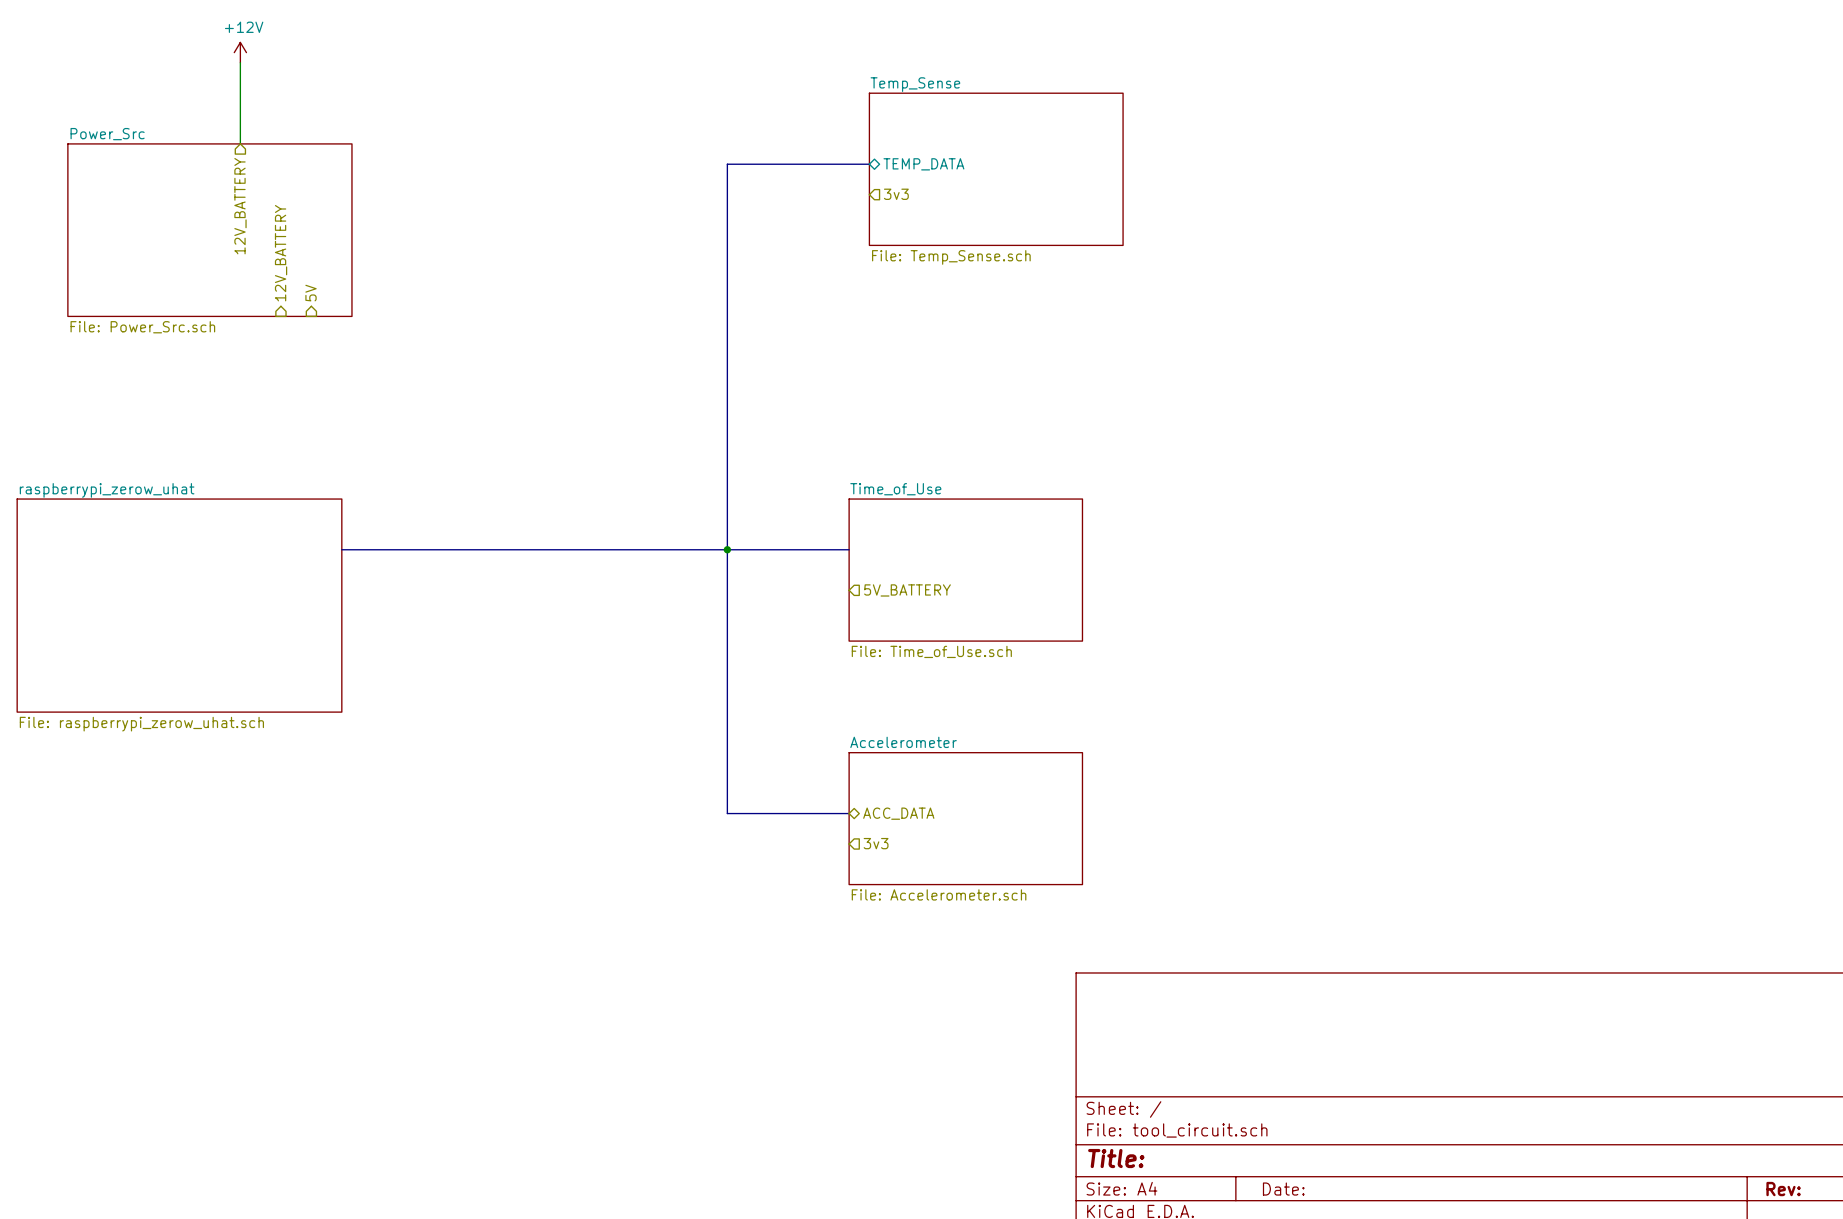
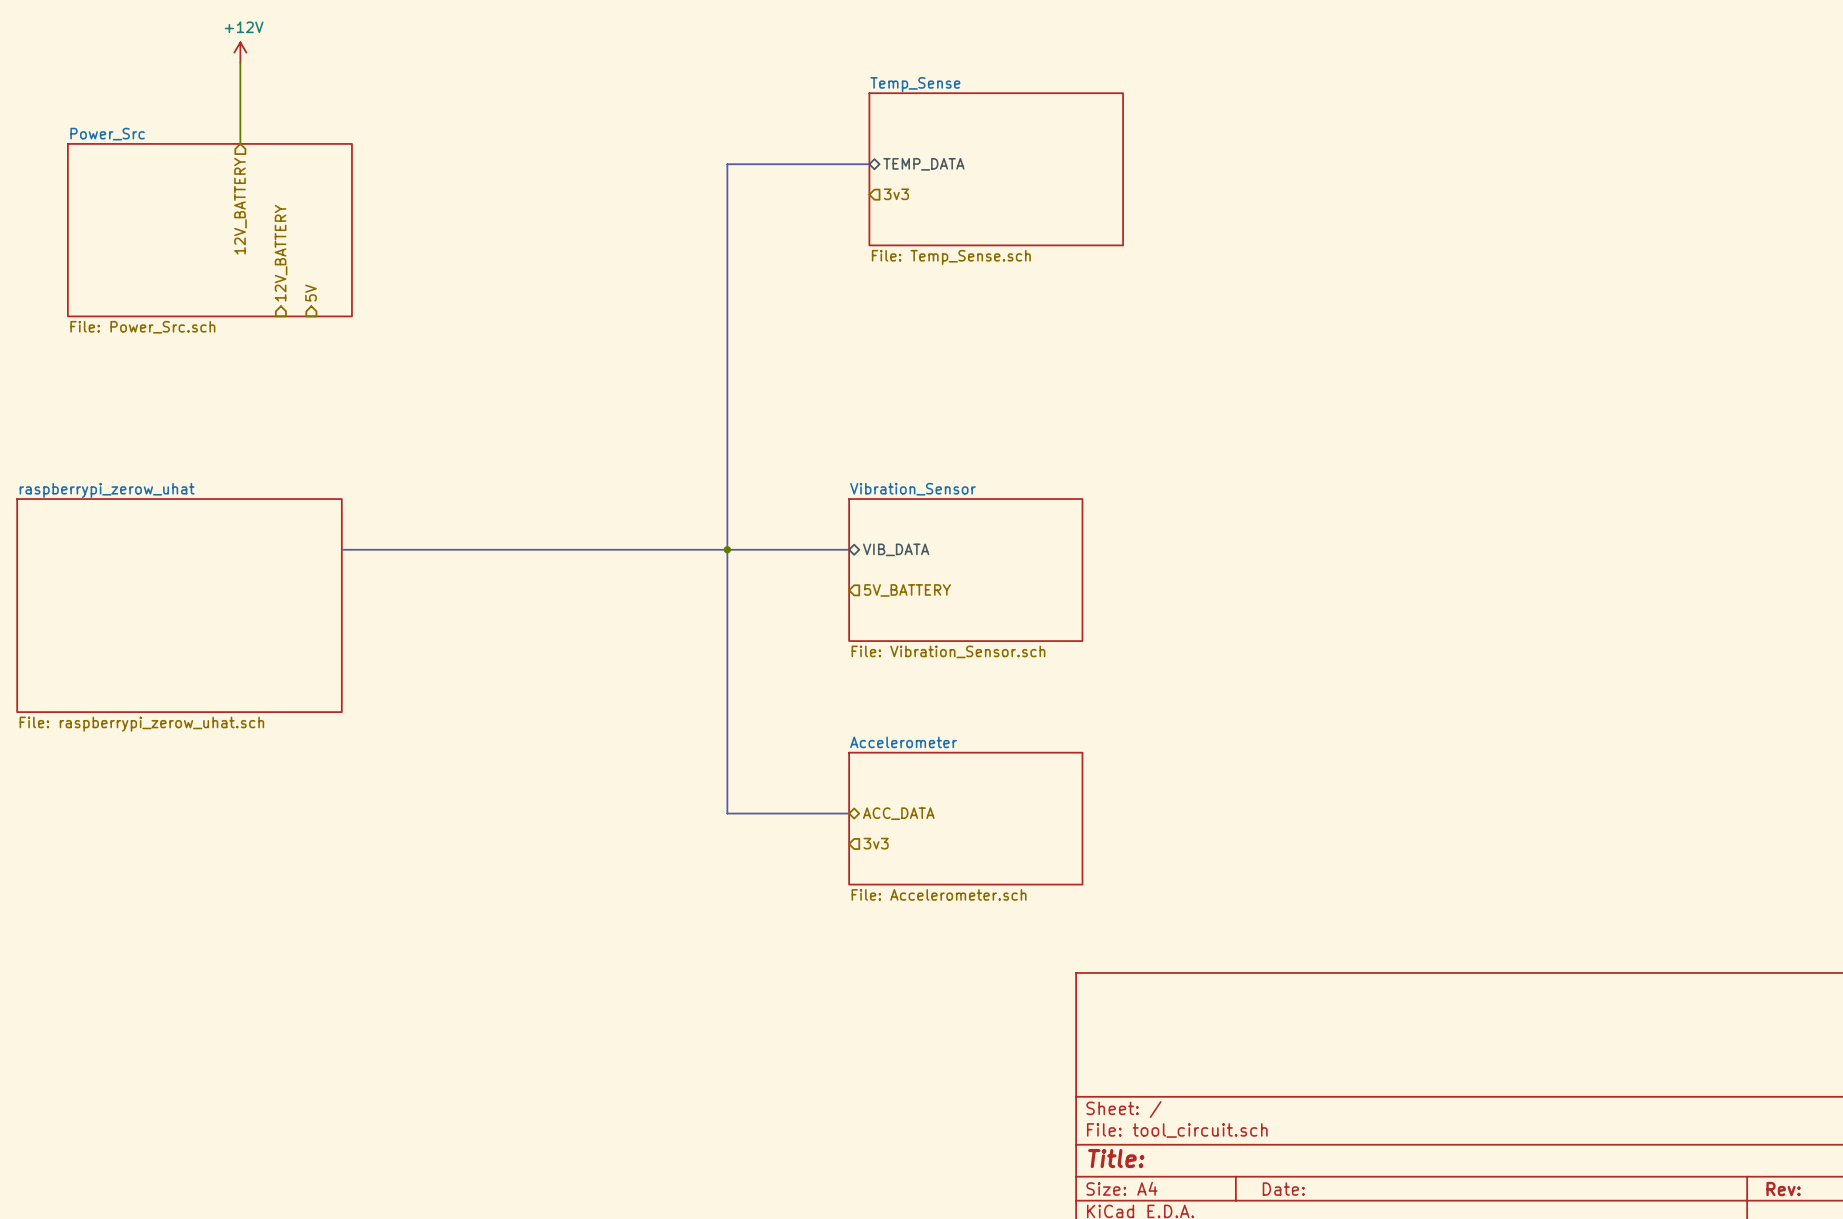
sheet Time_of_Use name: Time_of_Use (895, 489) -> Vibration_Sensor (912, 489)
sheet pin: none -> VIB_DATA (896, 549)
sheet Time_of_Use value: File: Time_of_Use.sch (931, 651) -> File: Vibration_Sensor.sch (948, 651)

